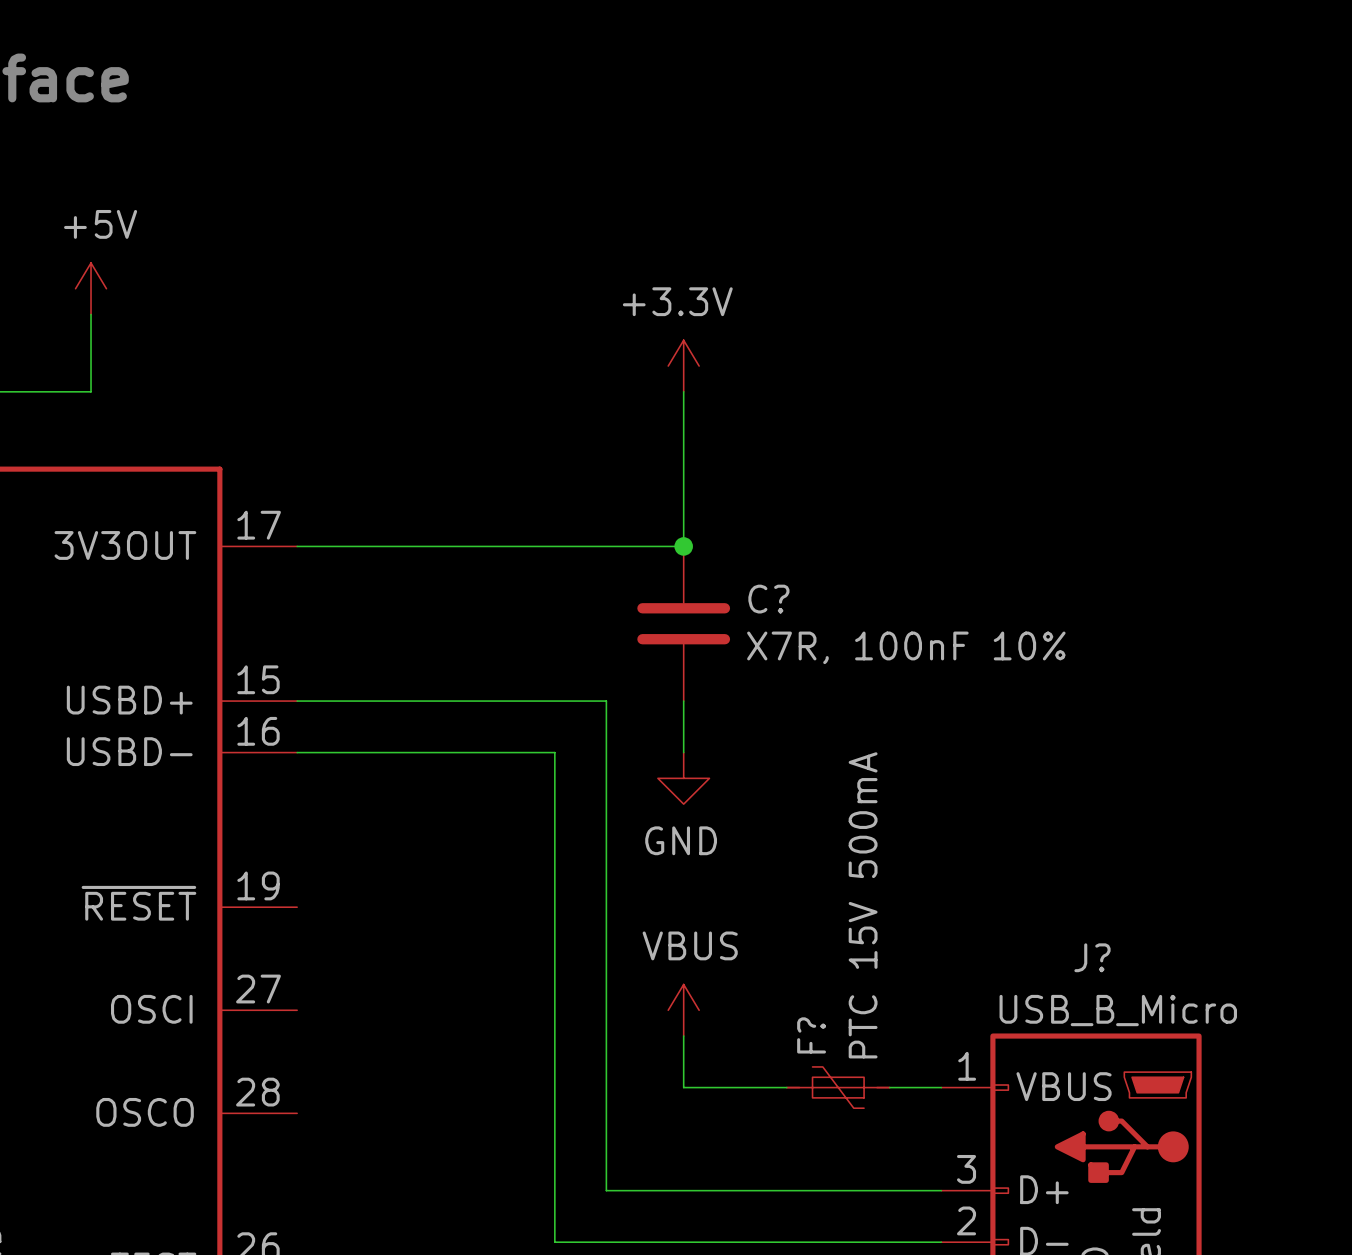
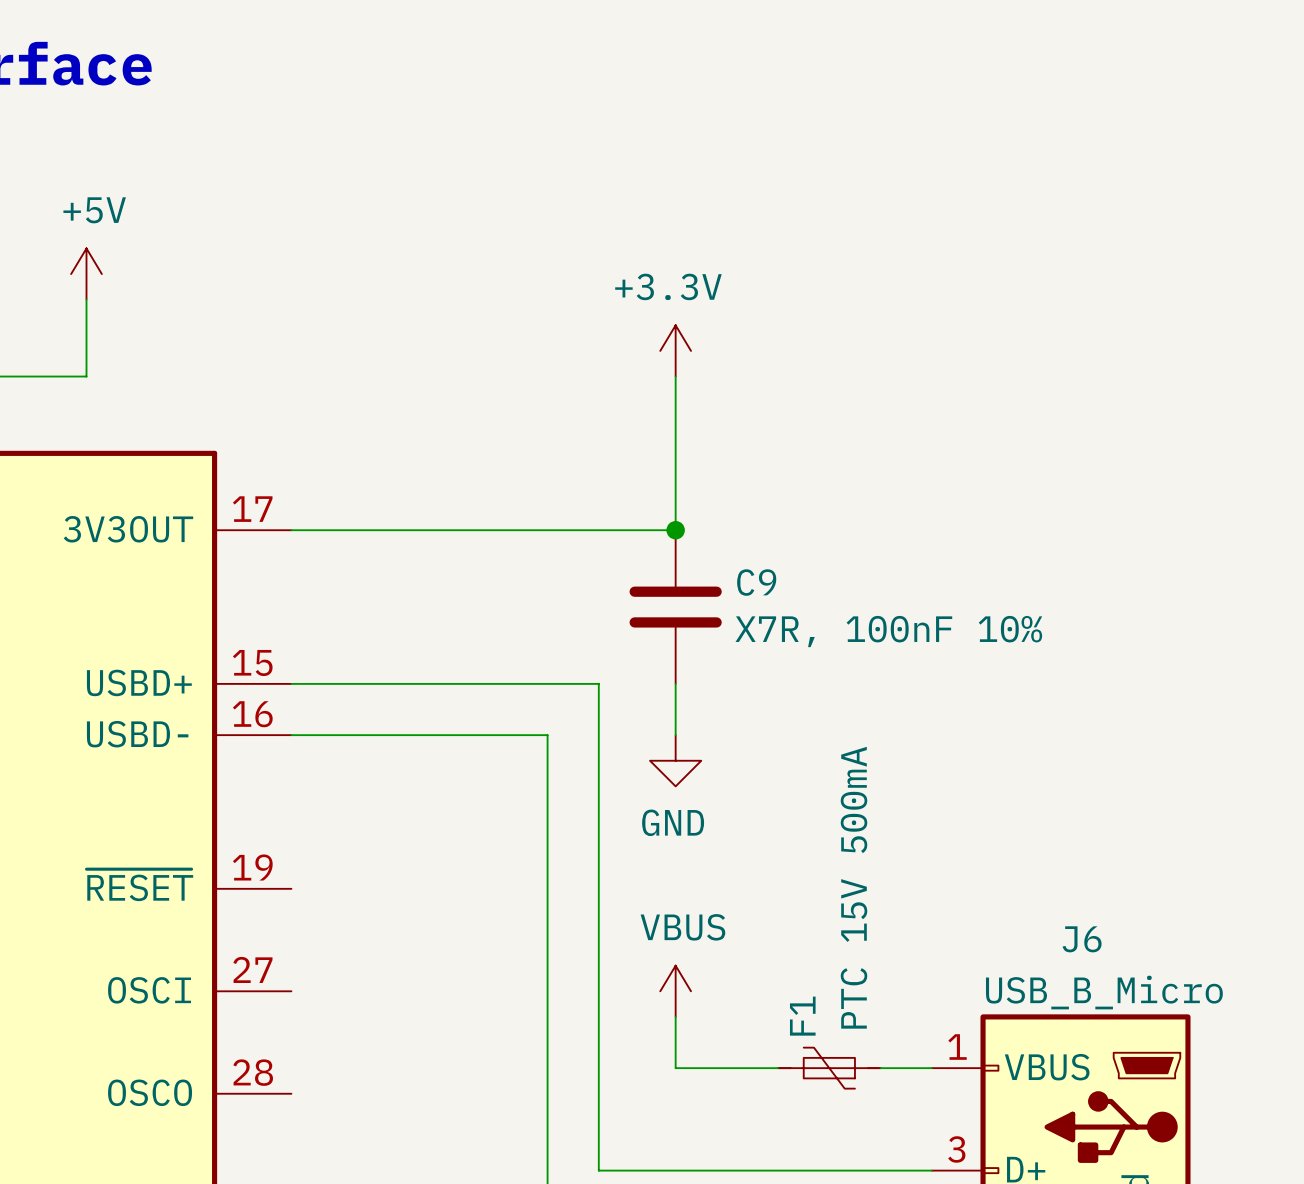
C? name: C? (768, 599) -> C9 (756, 582)
J? name: J? (1092, 957) -> J6 (1082, 939)
F? name: F? (811, 1035) -> F1 (802, 1016)

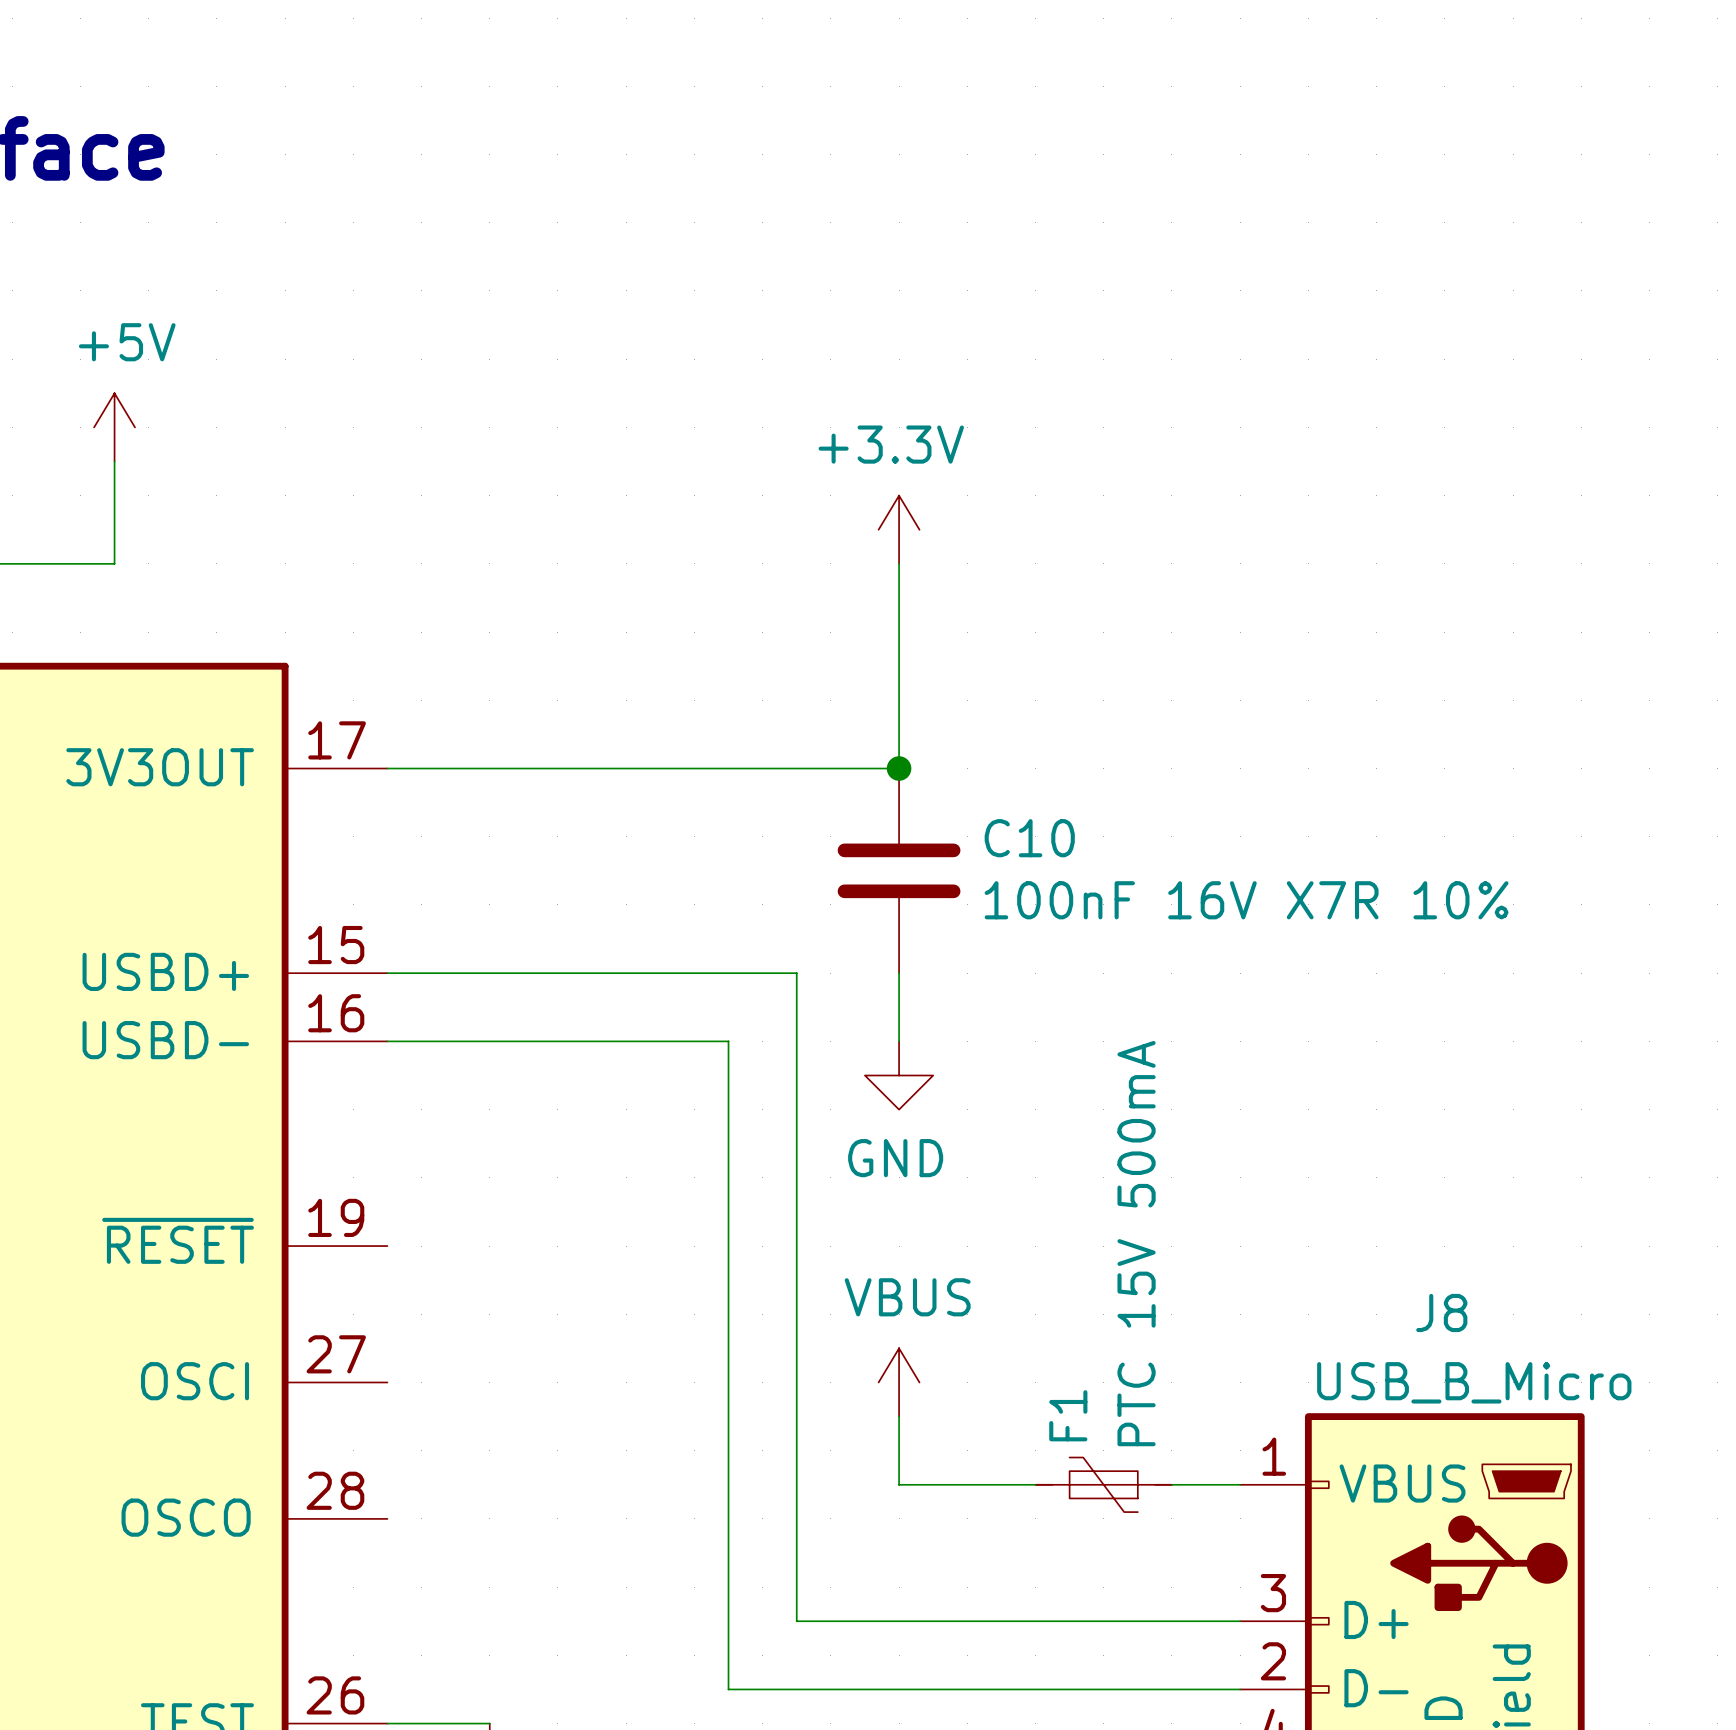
C9 name: C9 (756, 582) -> C10 (1029, 838)
C9 value: X7R, 100nF 10% (888, 631) -> 100nF 16V X7R 10% (1246, 900)
J6 name: J6 (1082, 939) -> J8 (1441, 1312)

